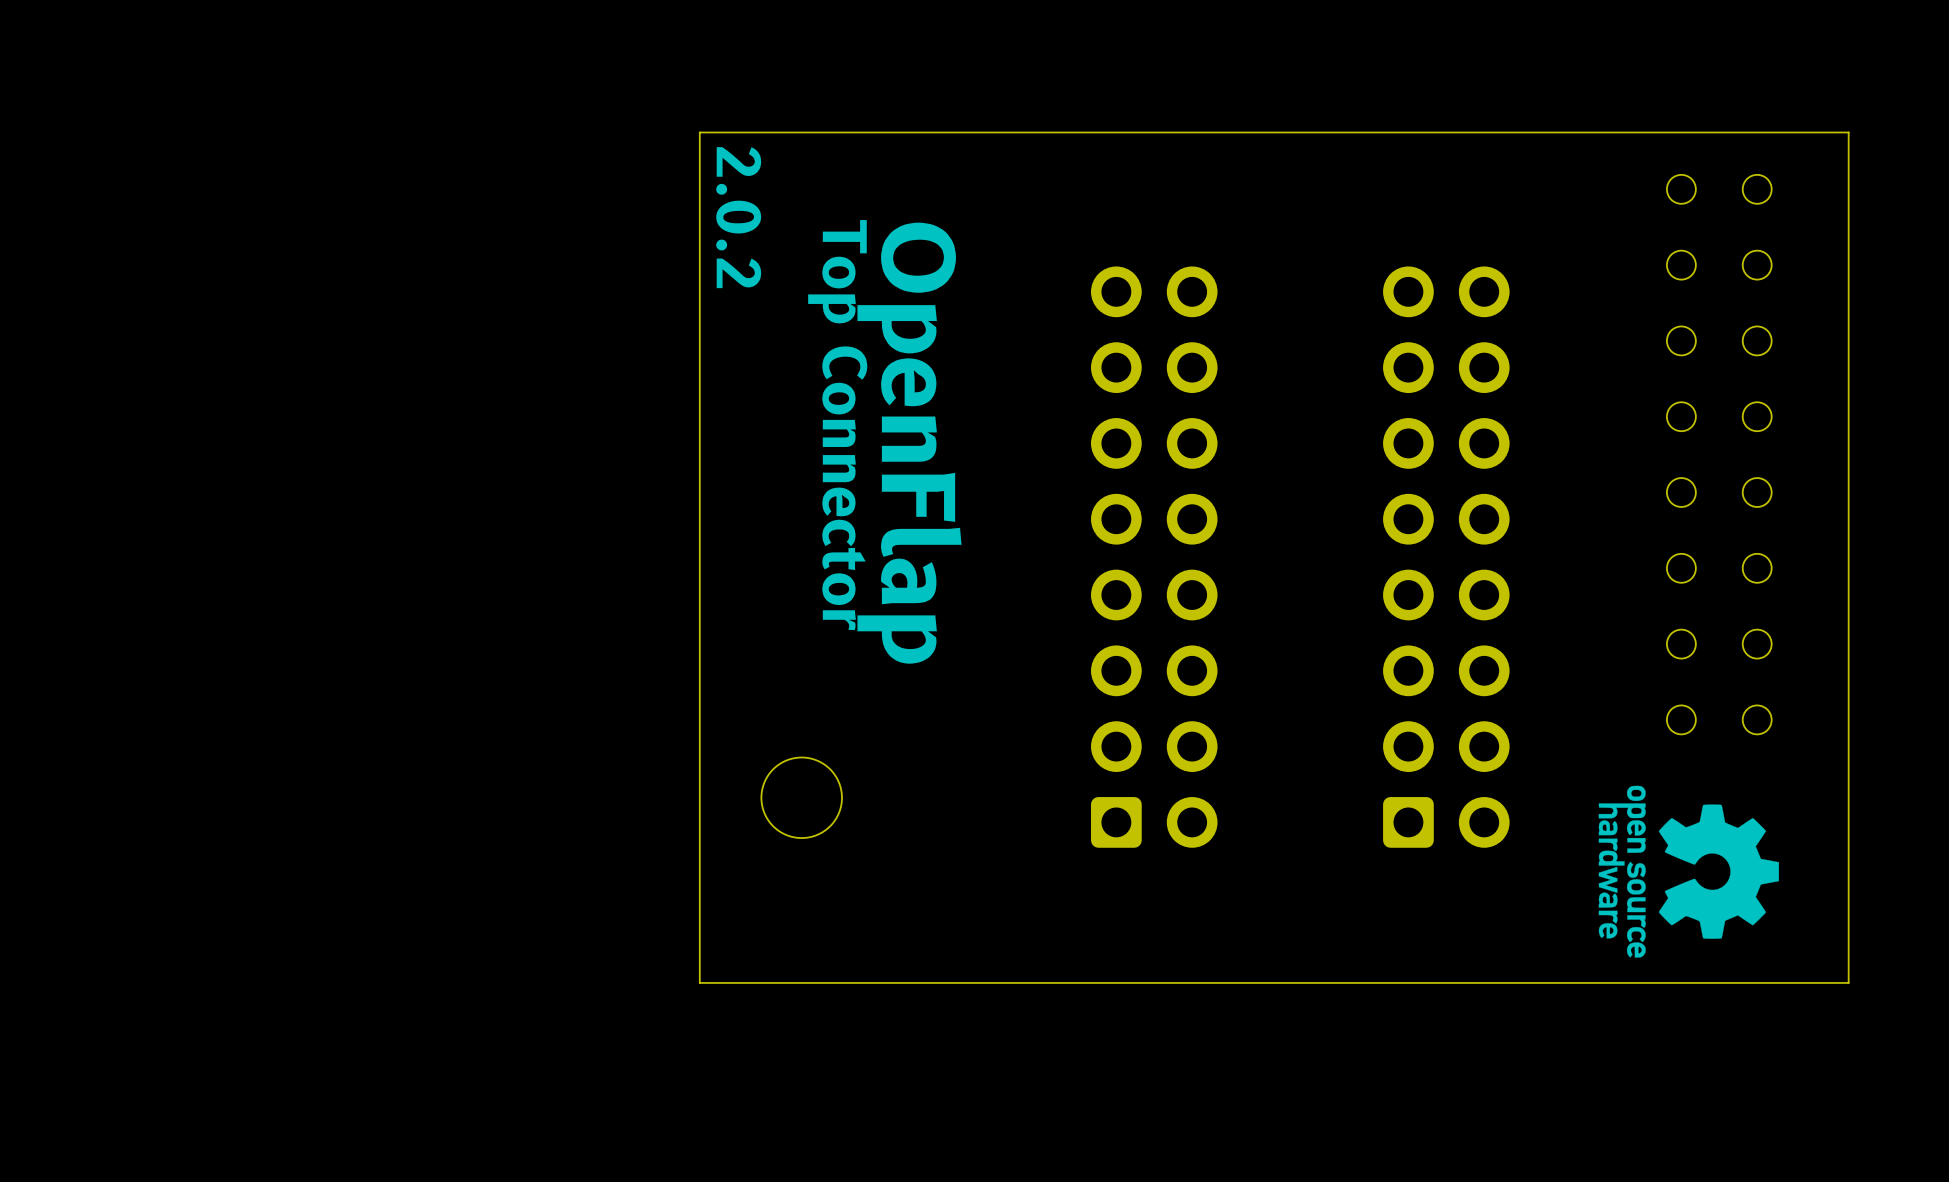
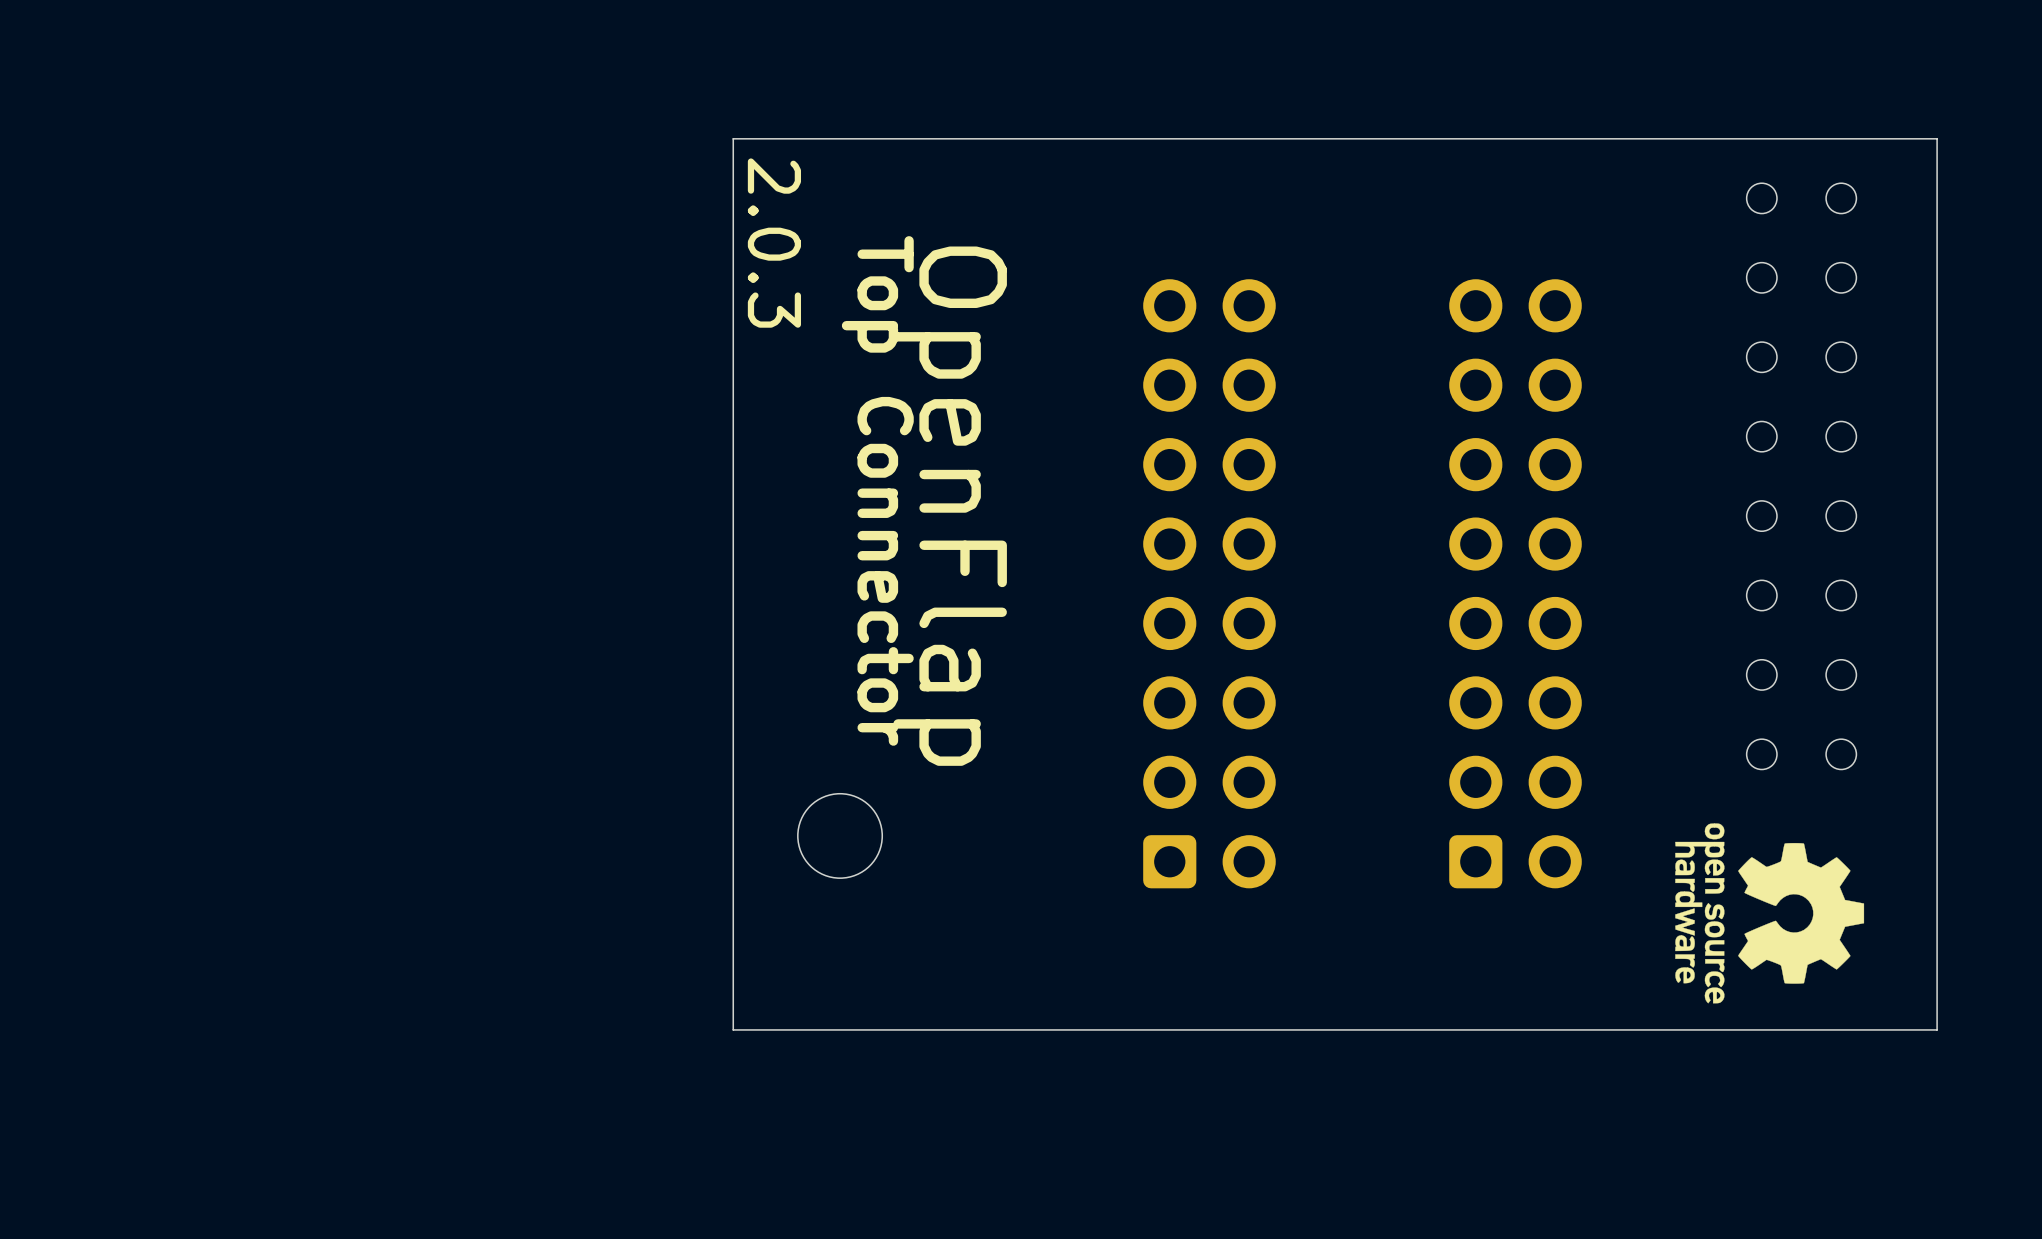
text: 2.0.2 (738, 217) -> 2.0.3 (774, 243)

